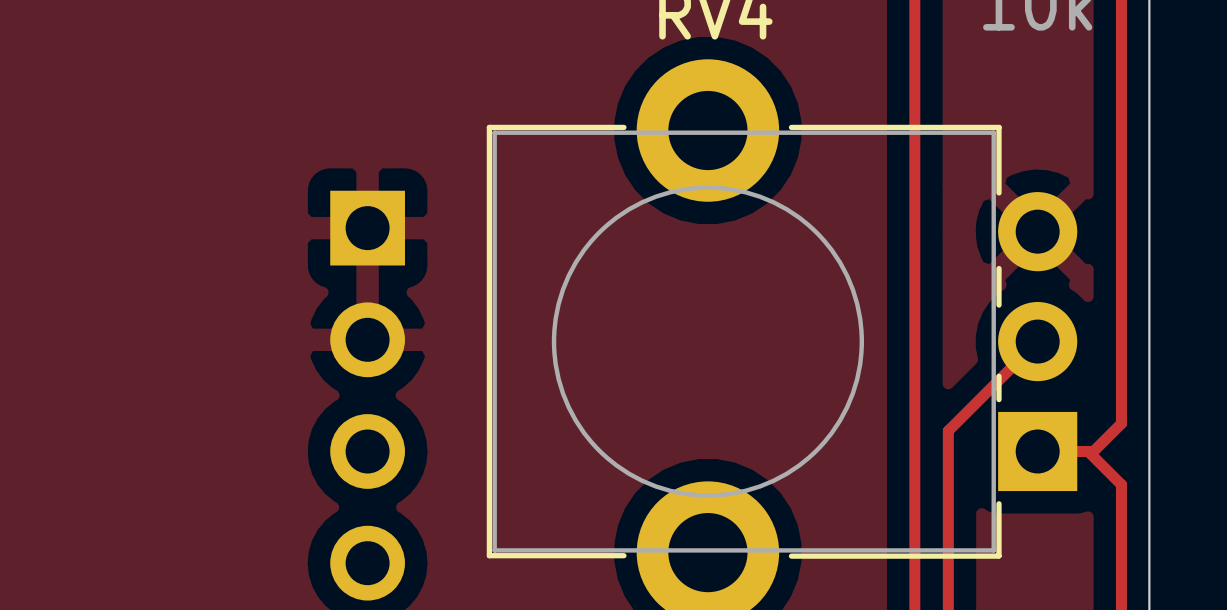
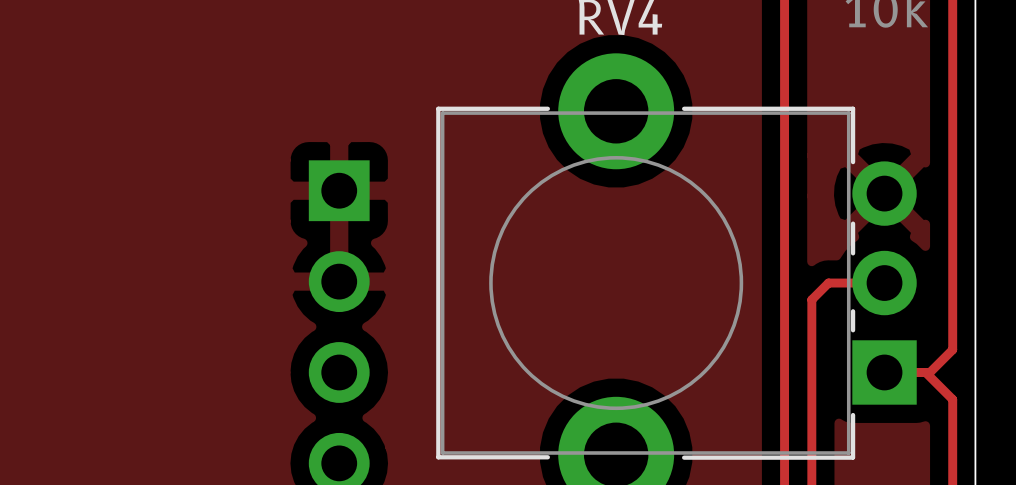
track: (1037, 341) (948, 430) -> (884, 283) (828, 283) (811, 299) (811, 355)

